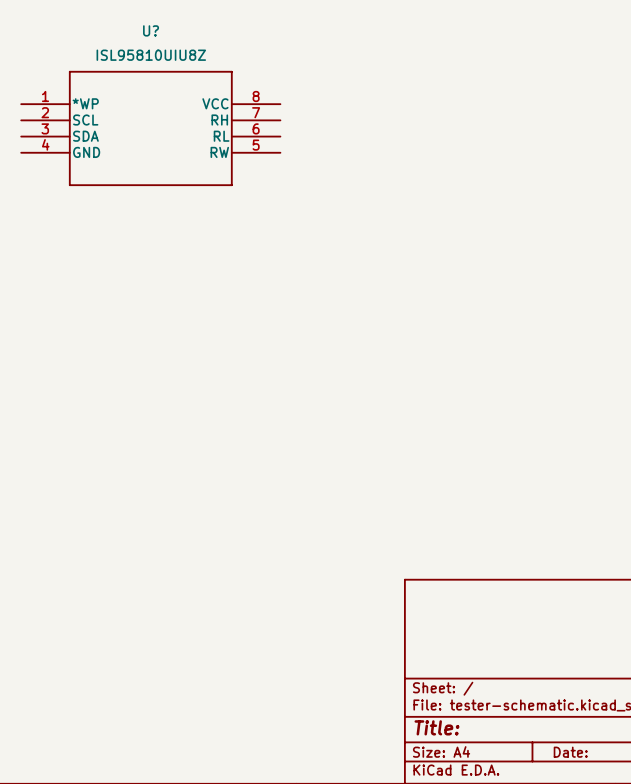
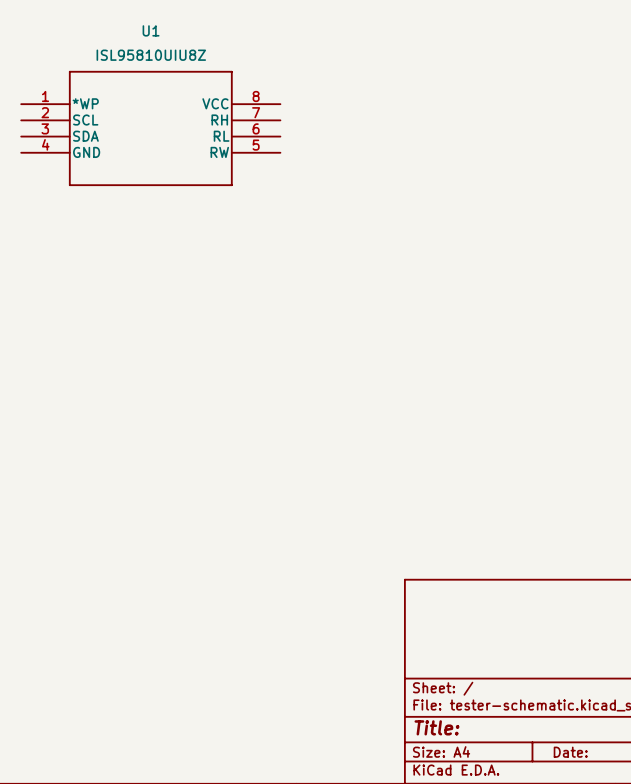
U? name: U? (151, 30) -> U1 (151, 30)

